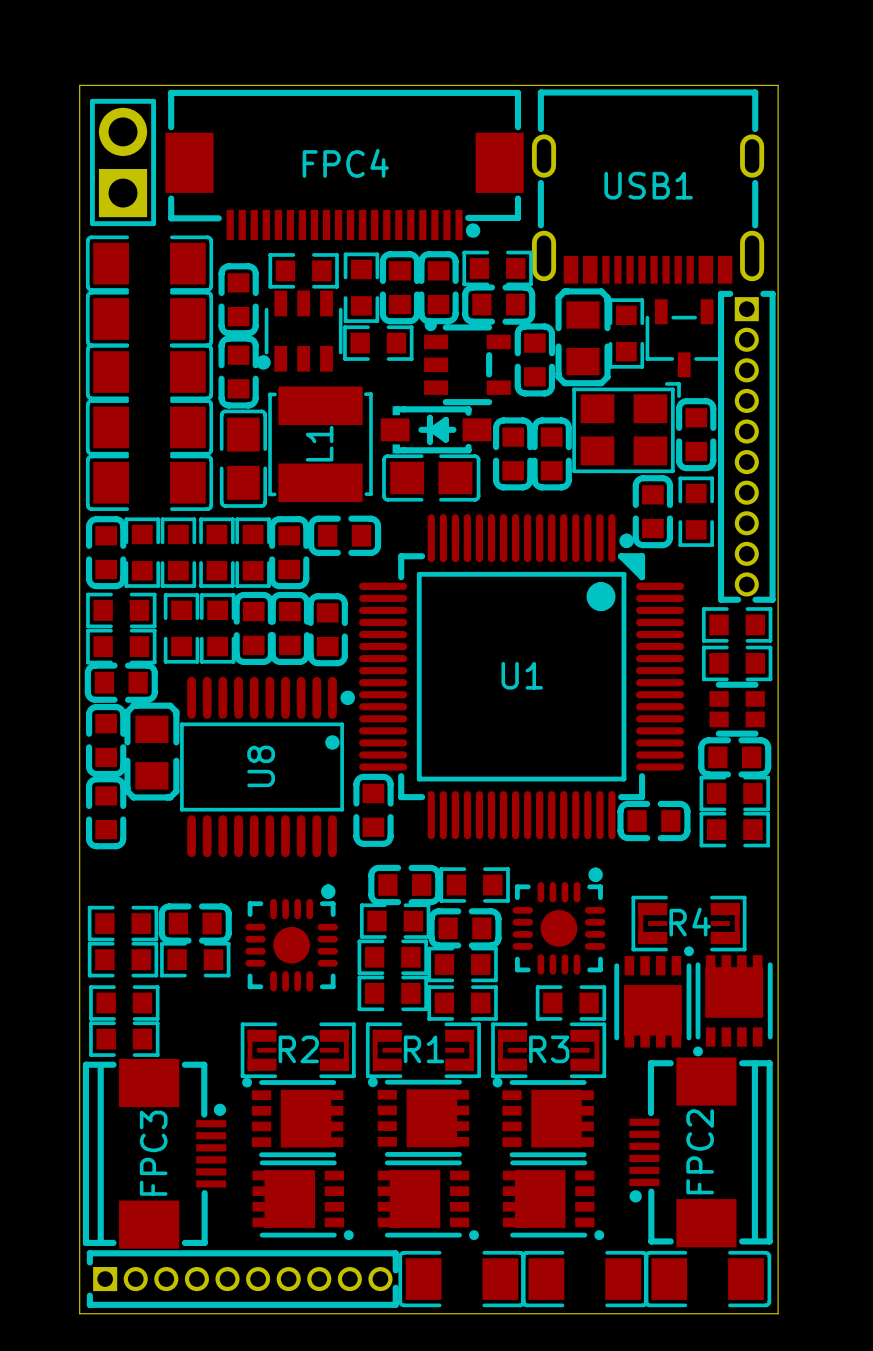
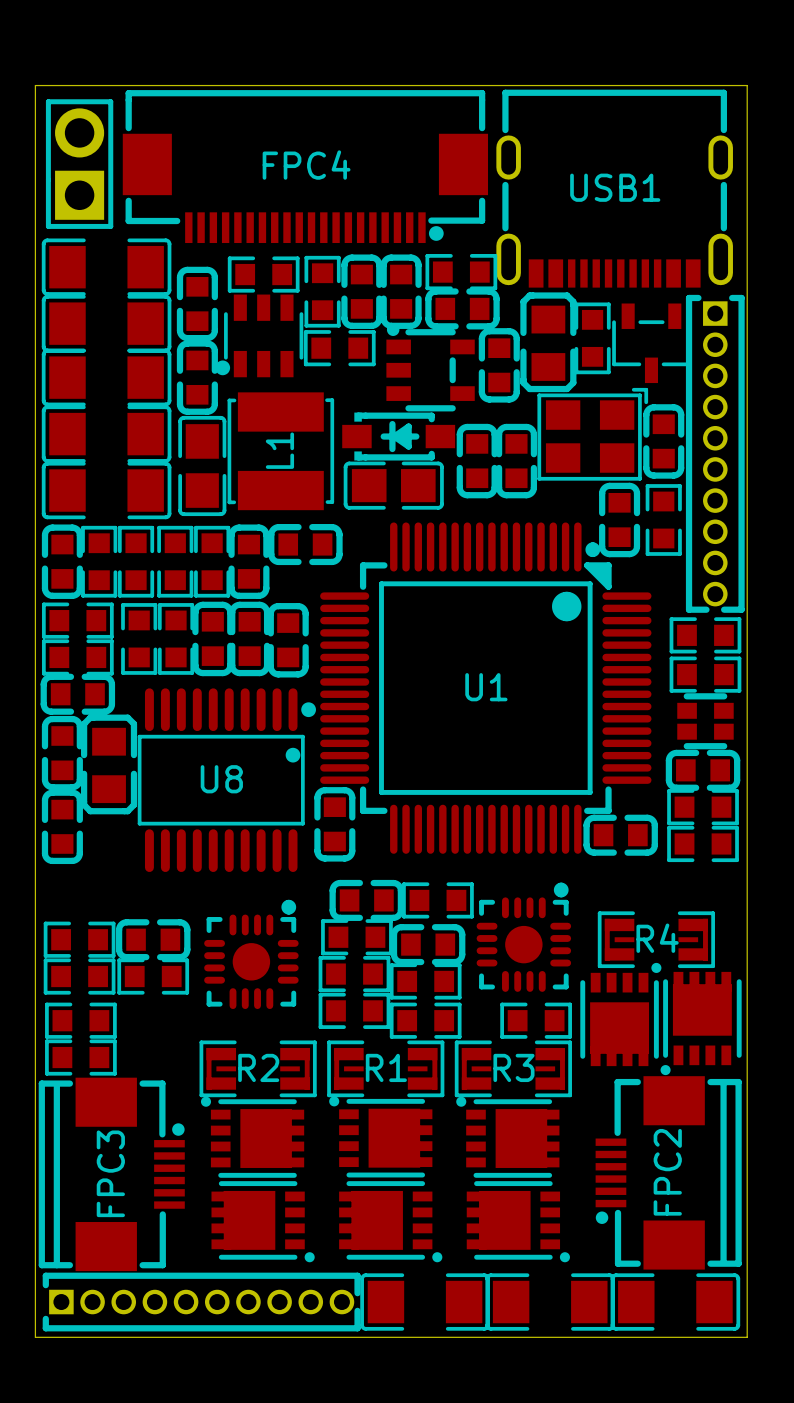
U8 name rotation: 0° (261, 766) -> 90° clockwise (221, 779)

